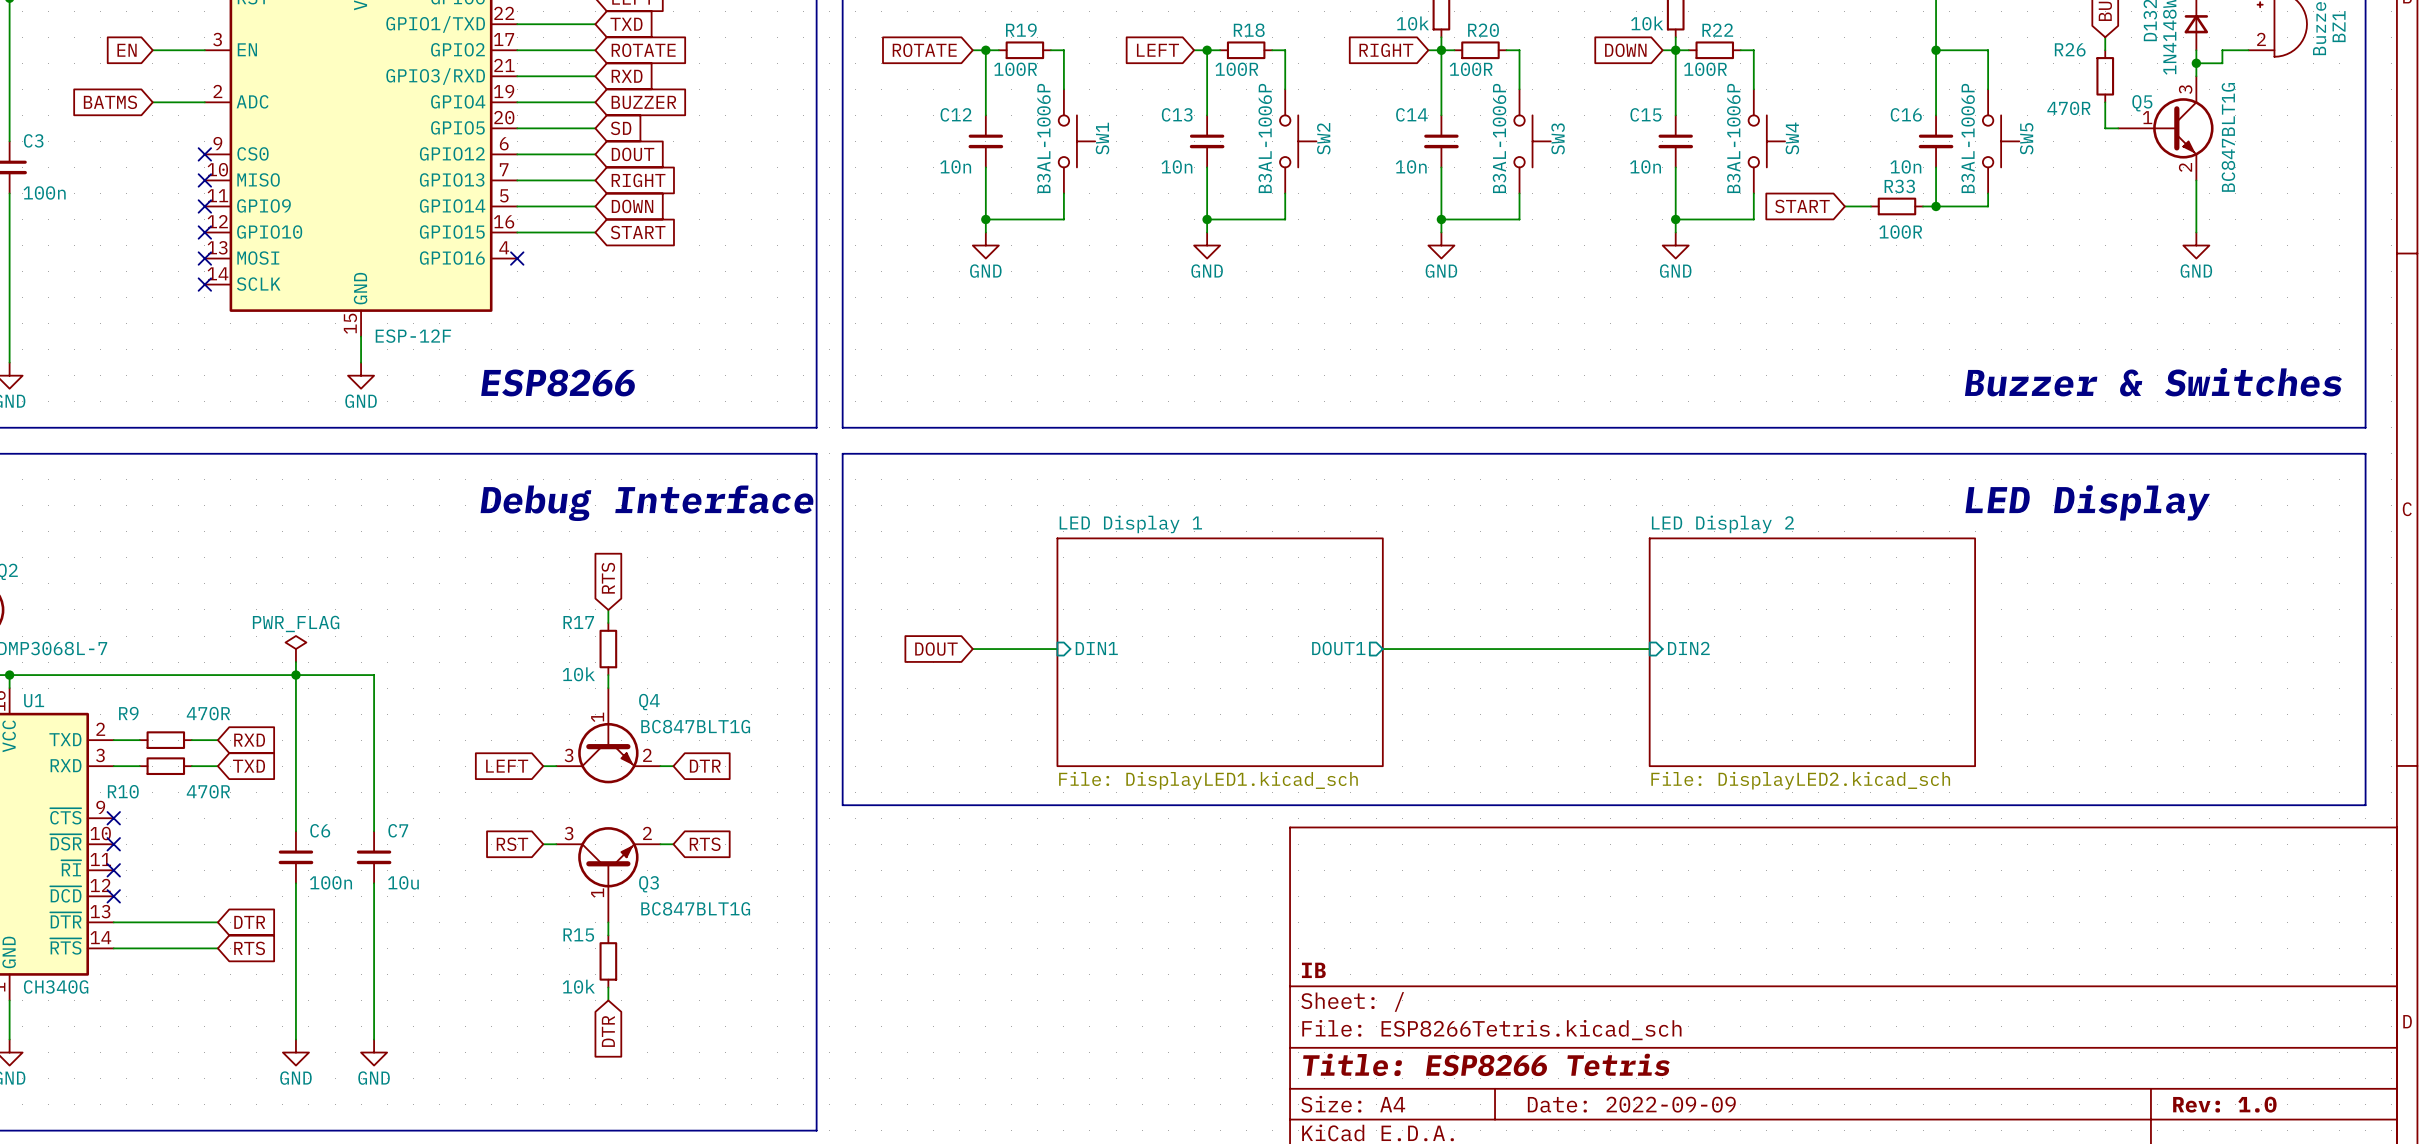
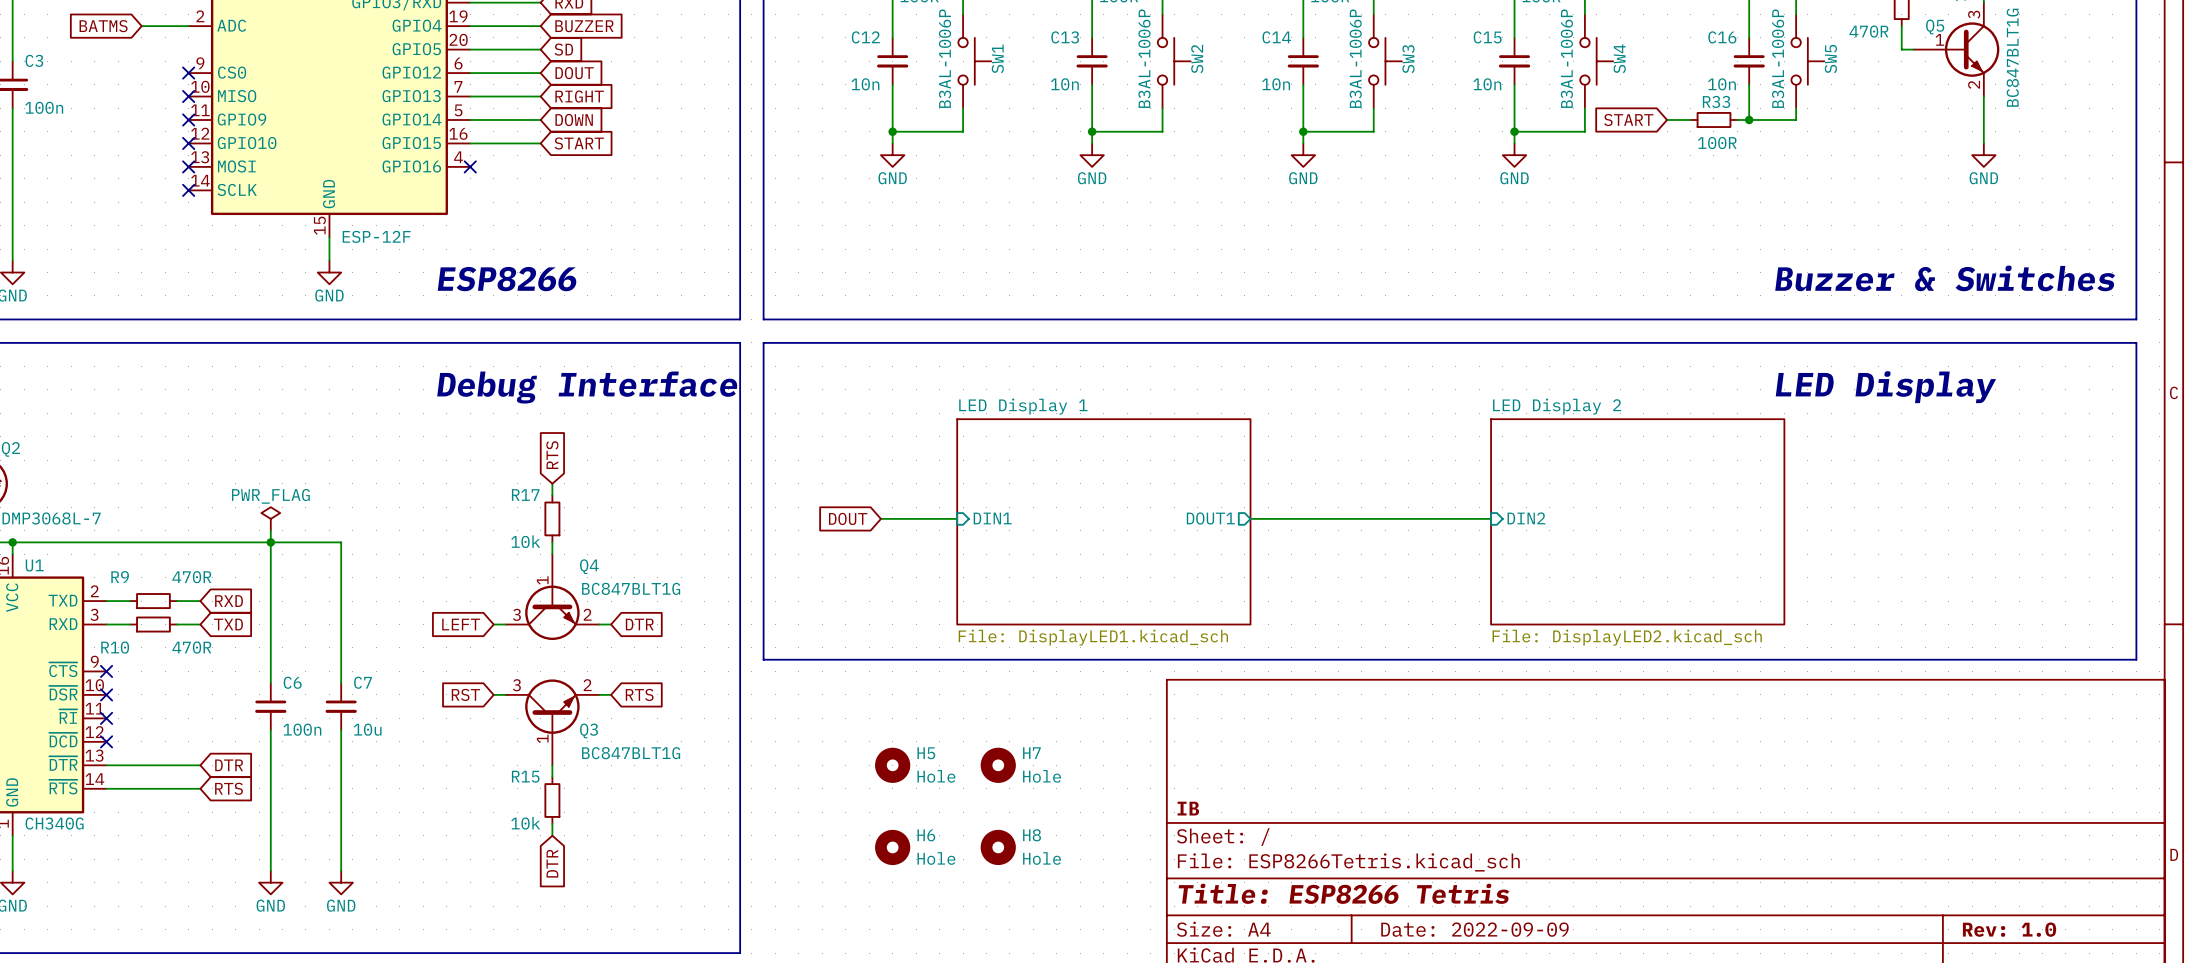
H5: none -> Hole (892, 765)
H7: none -> Hole (998, 765)
H6: none -> Hole (892, 847)
H8: none -> Hole (998, 847)

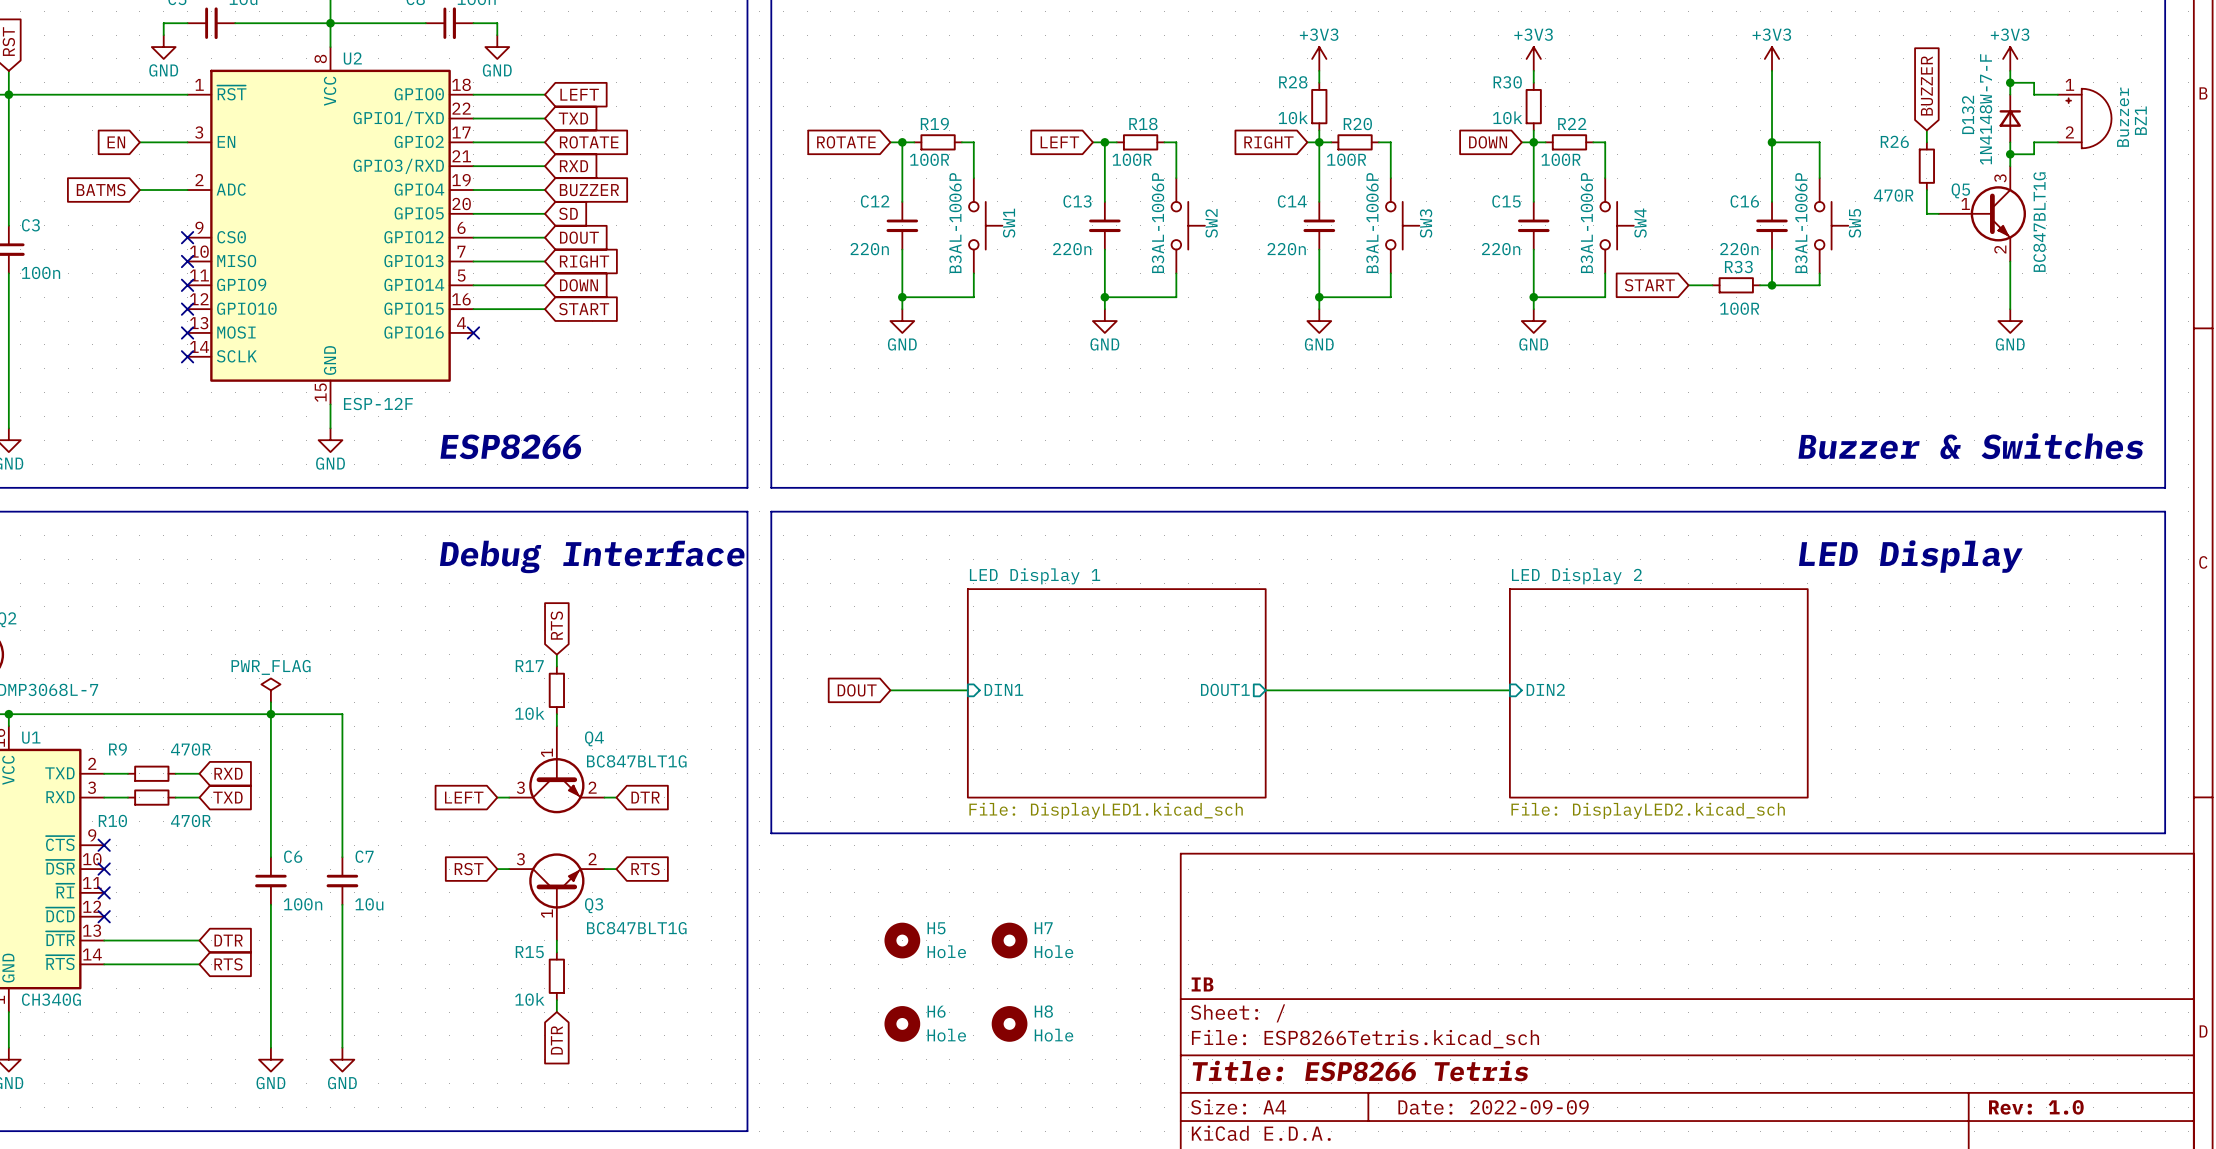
C12 value: 10n (865, 84) -> 220n (869, 249)
C13 value: 10n (1064, 84) -> 220n (1072, 249)
C14 value: 10n (1276, 84) -> 220n (1286, 249)
C15 value: 10n (1487, 84) -> 220n (1501, 249)
C16 value: 10n (1722, 84) -> 220n (1739, 249)

